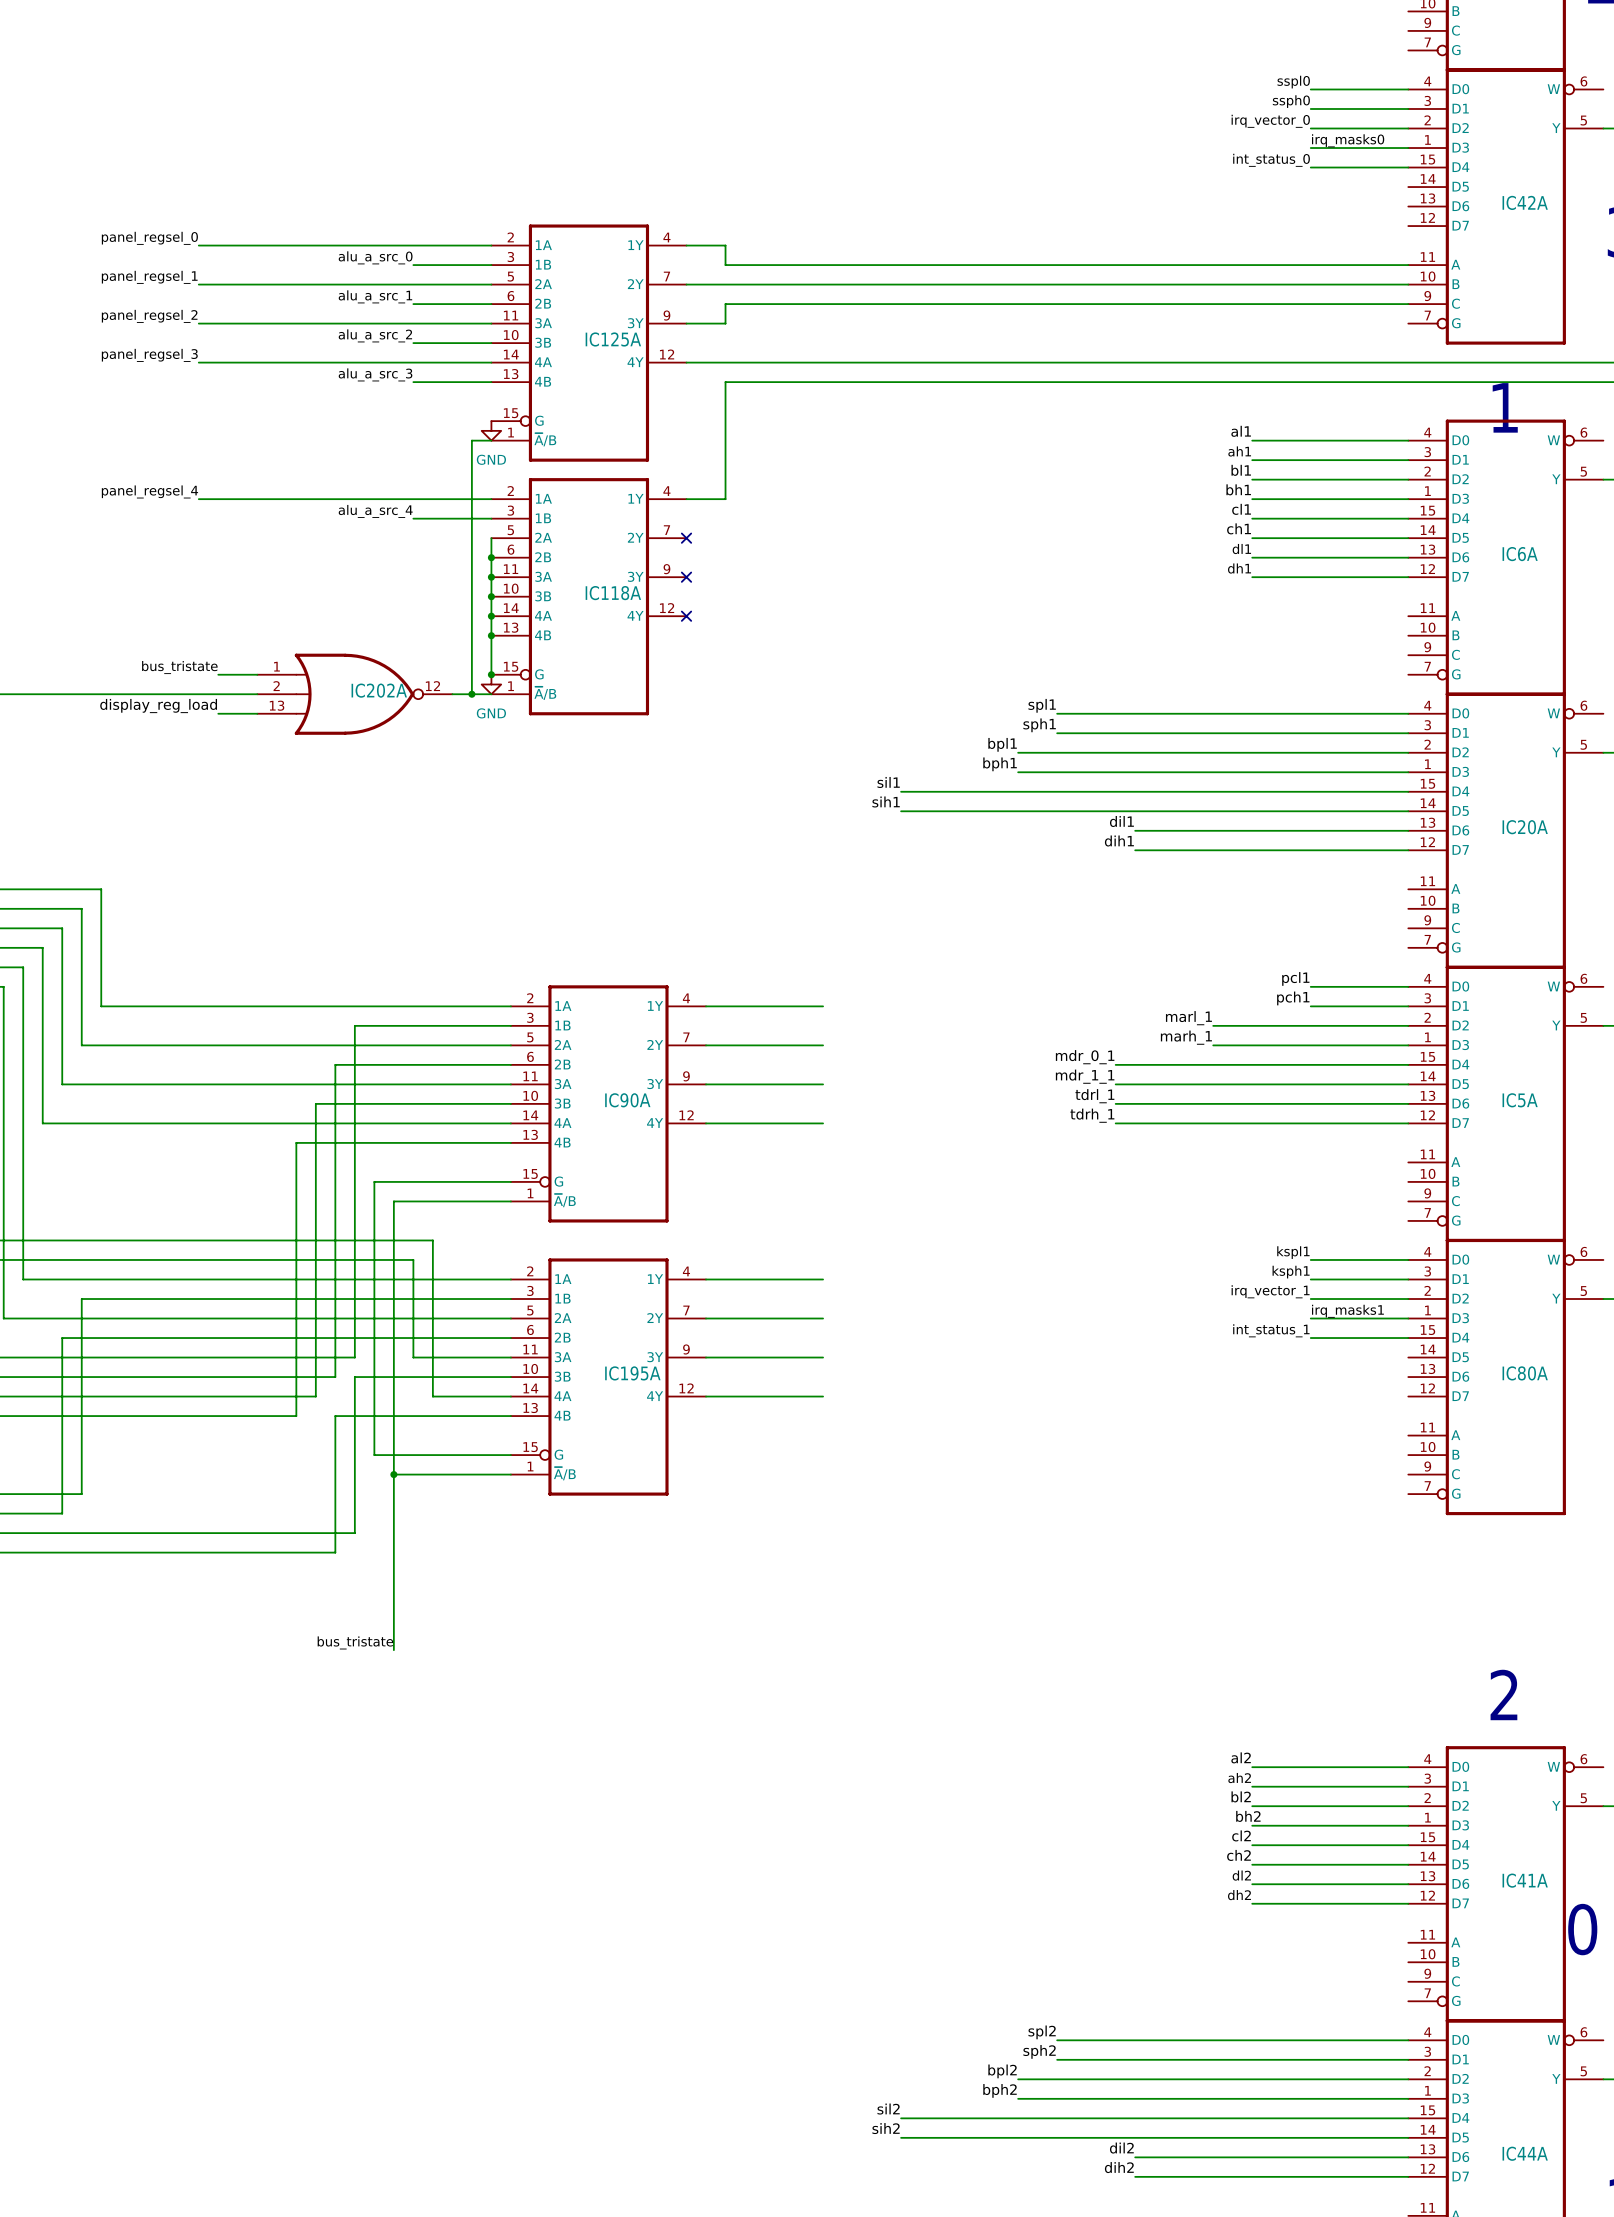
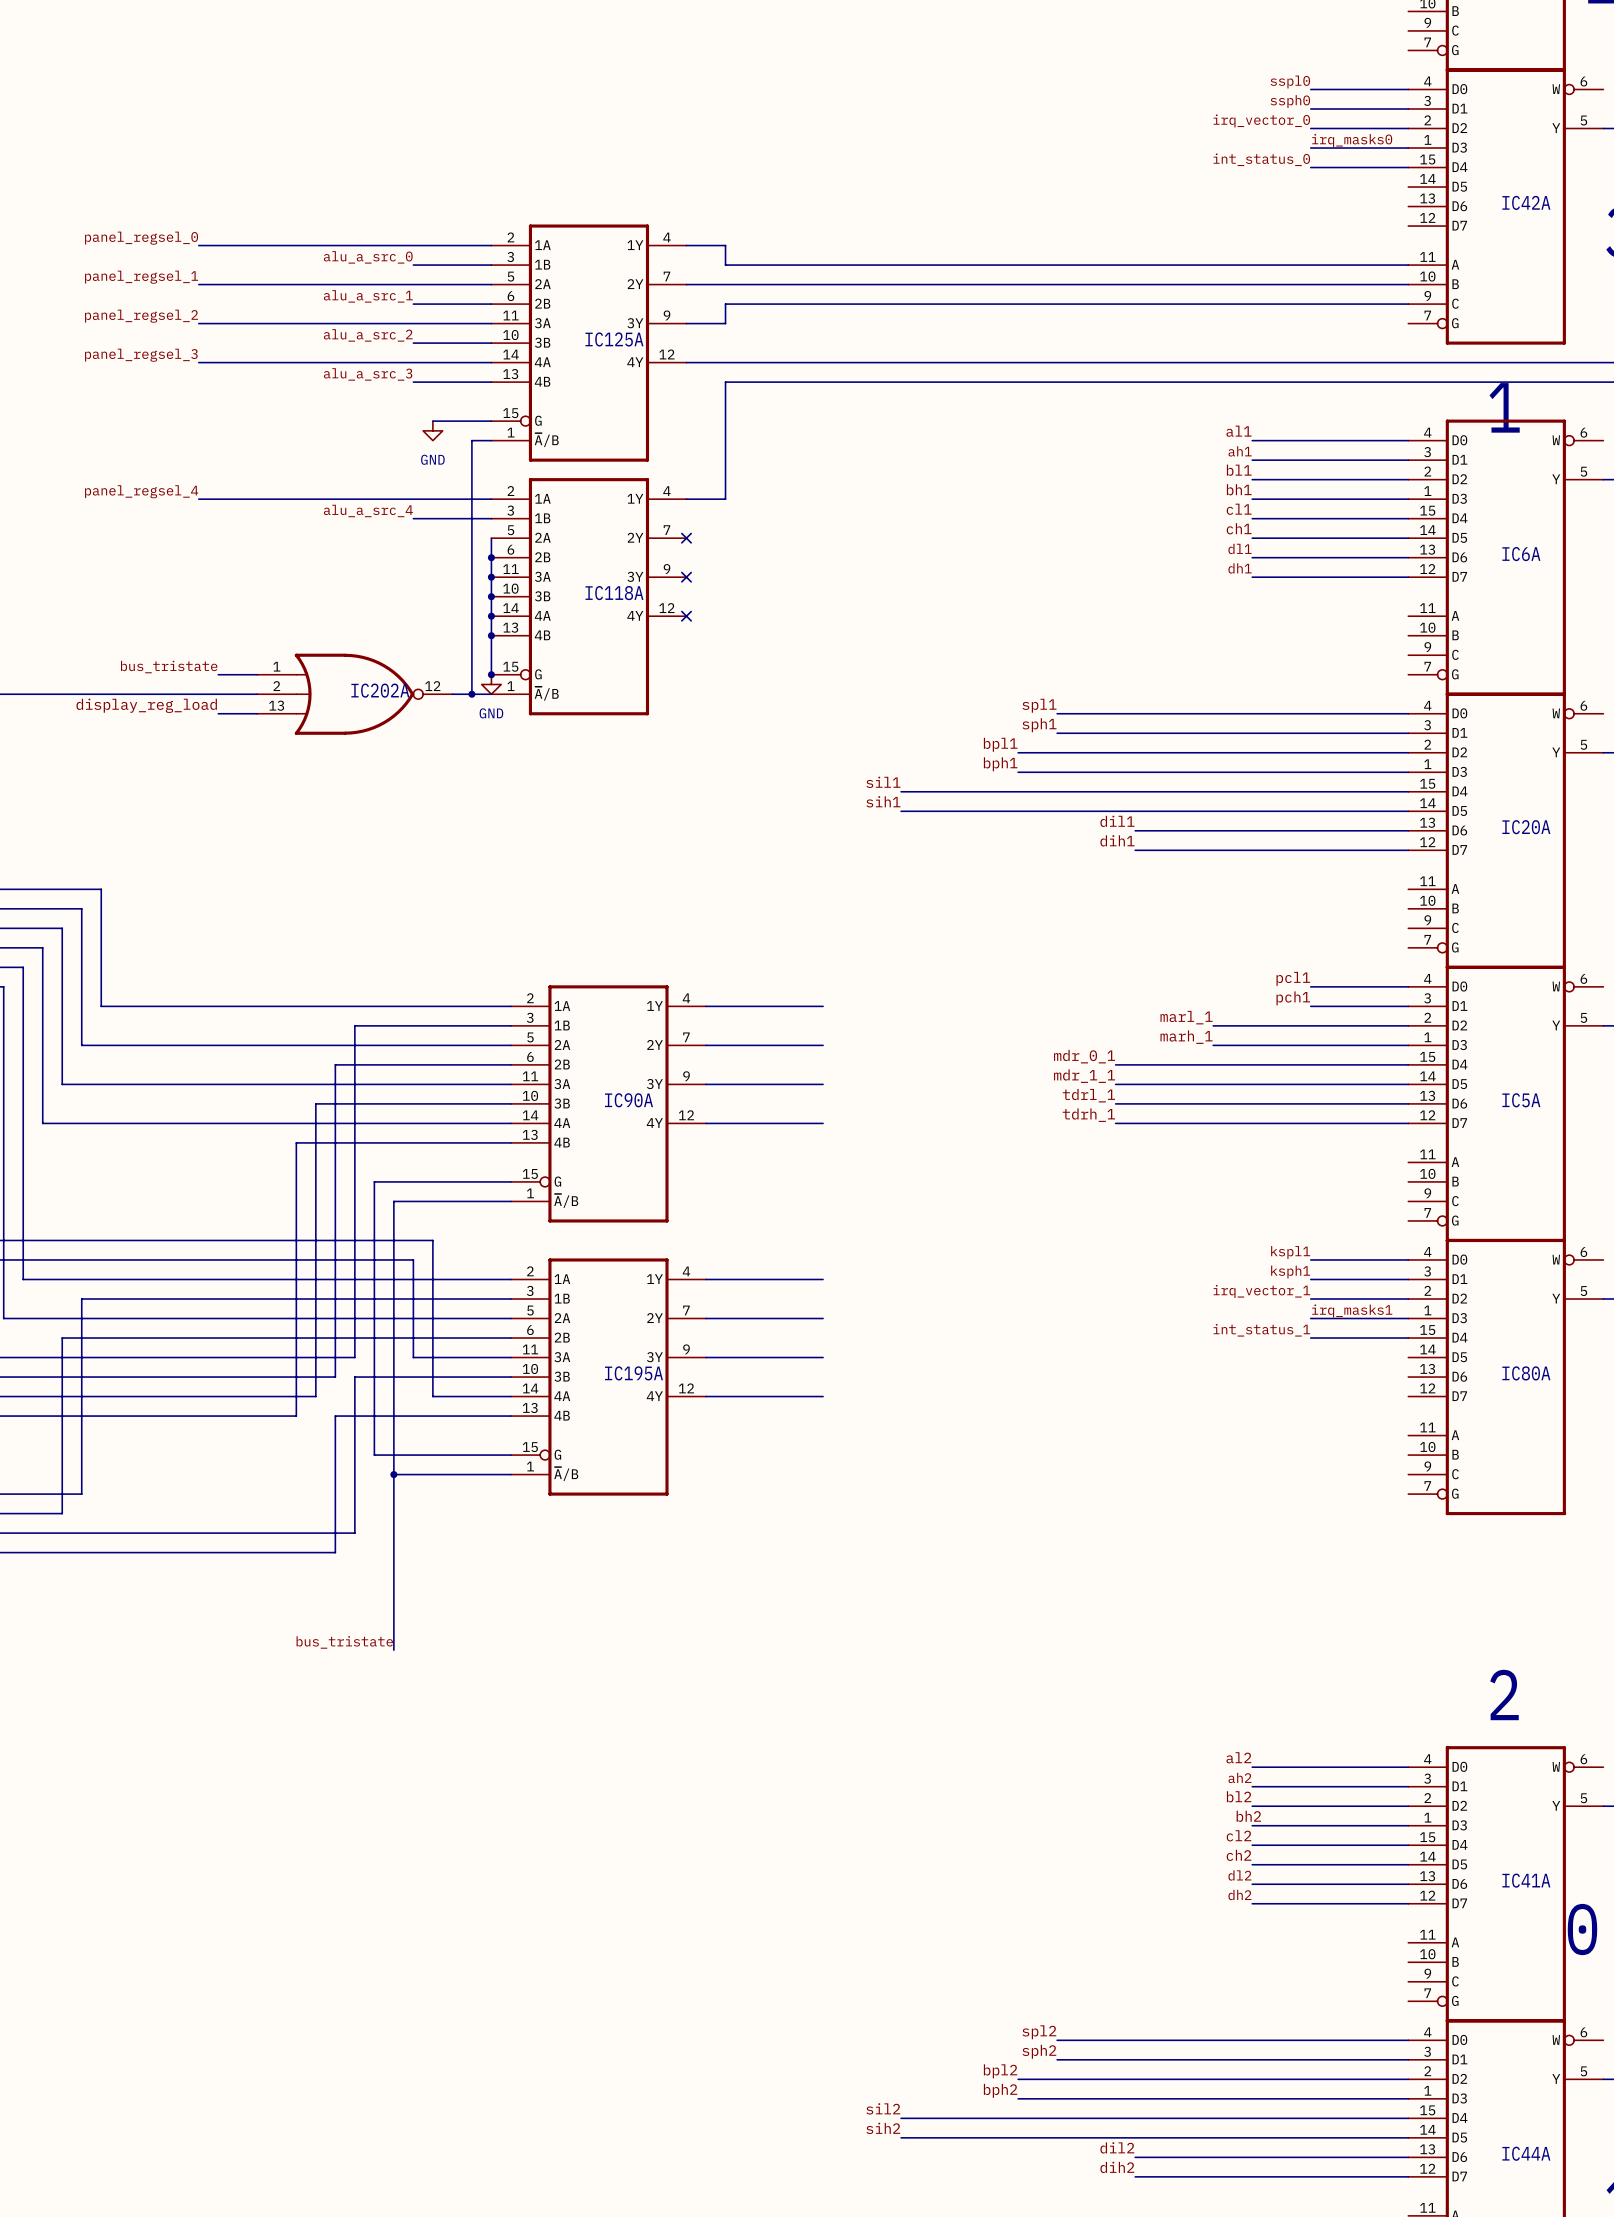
wire: none -> (432, 421) (491, 421)
power symbol position: GND (491, 430) -> GND (432, 430)

